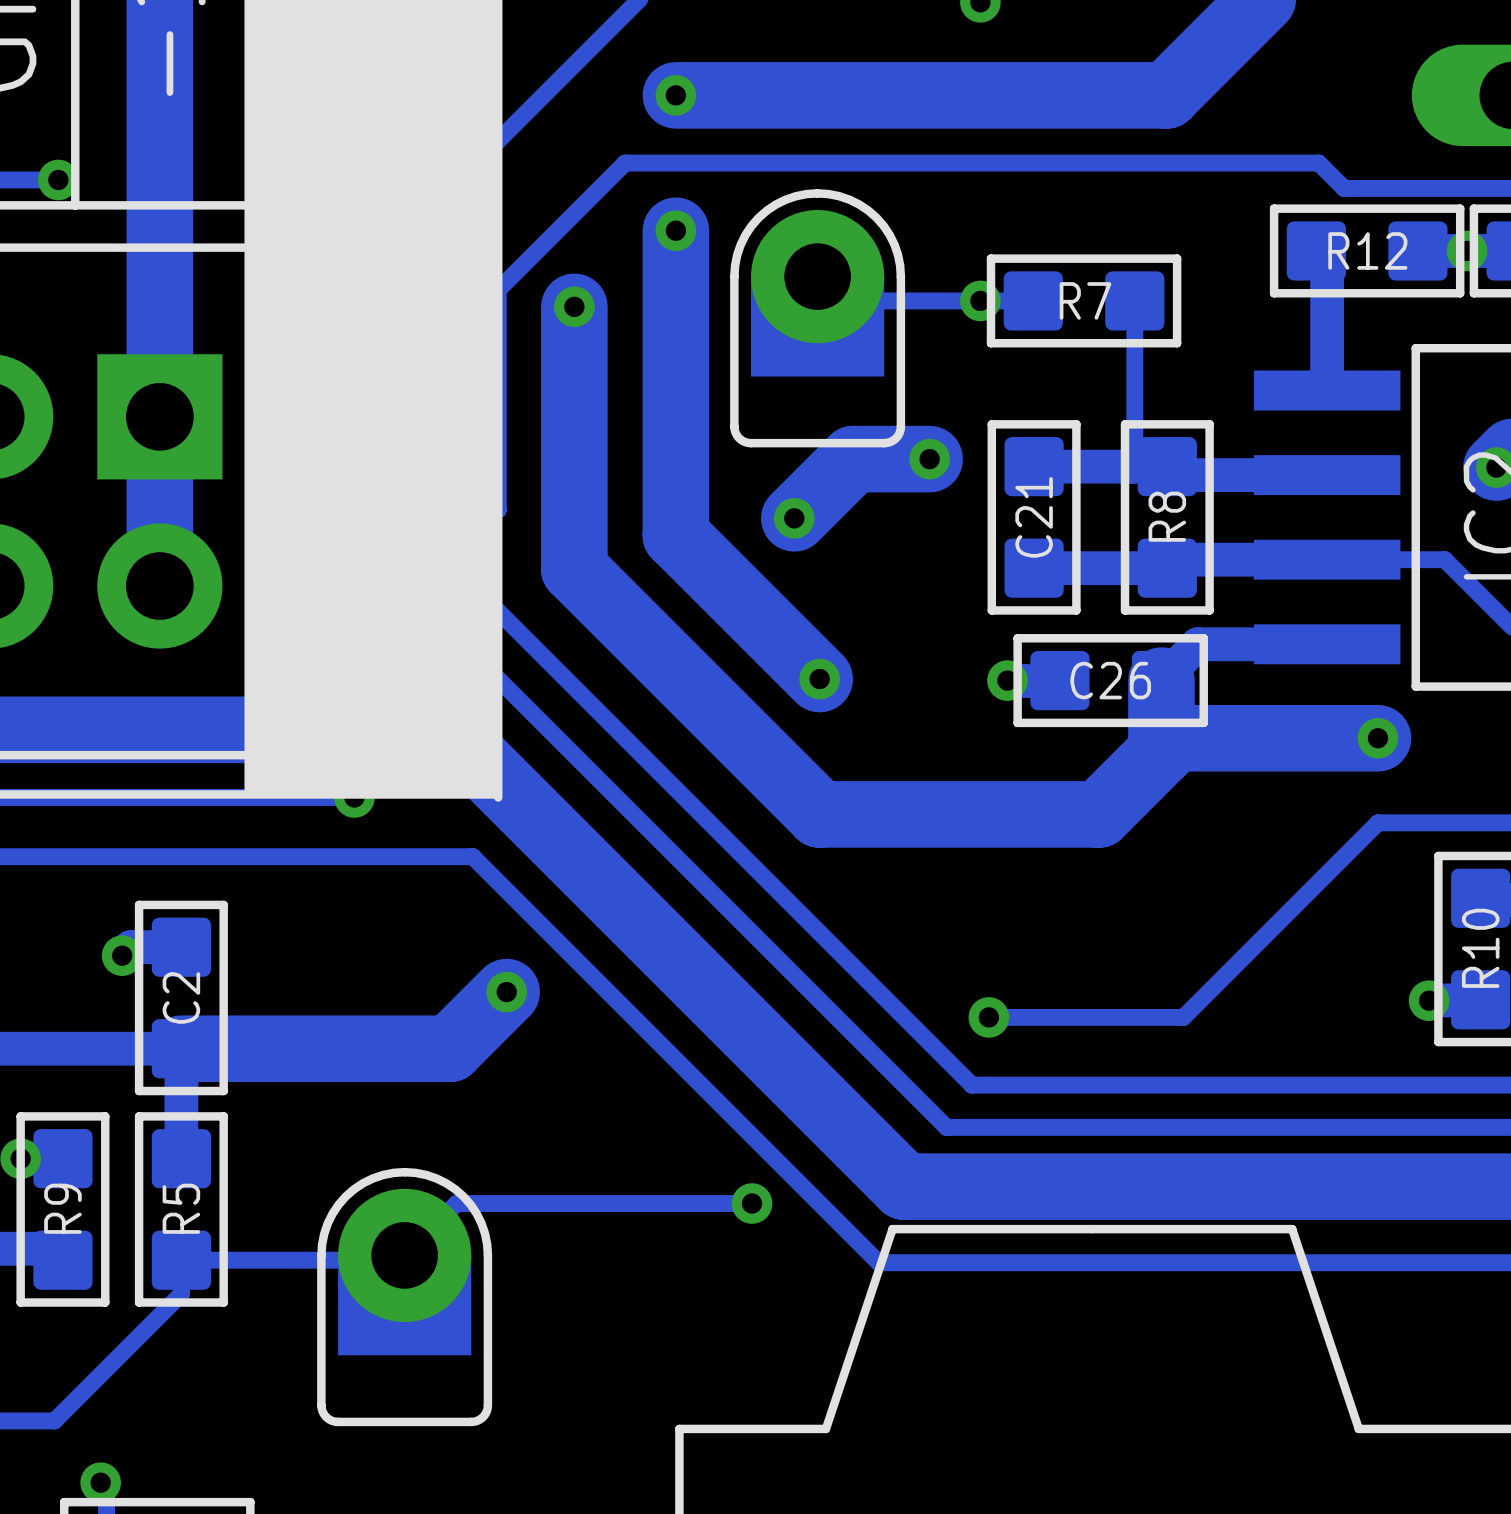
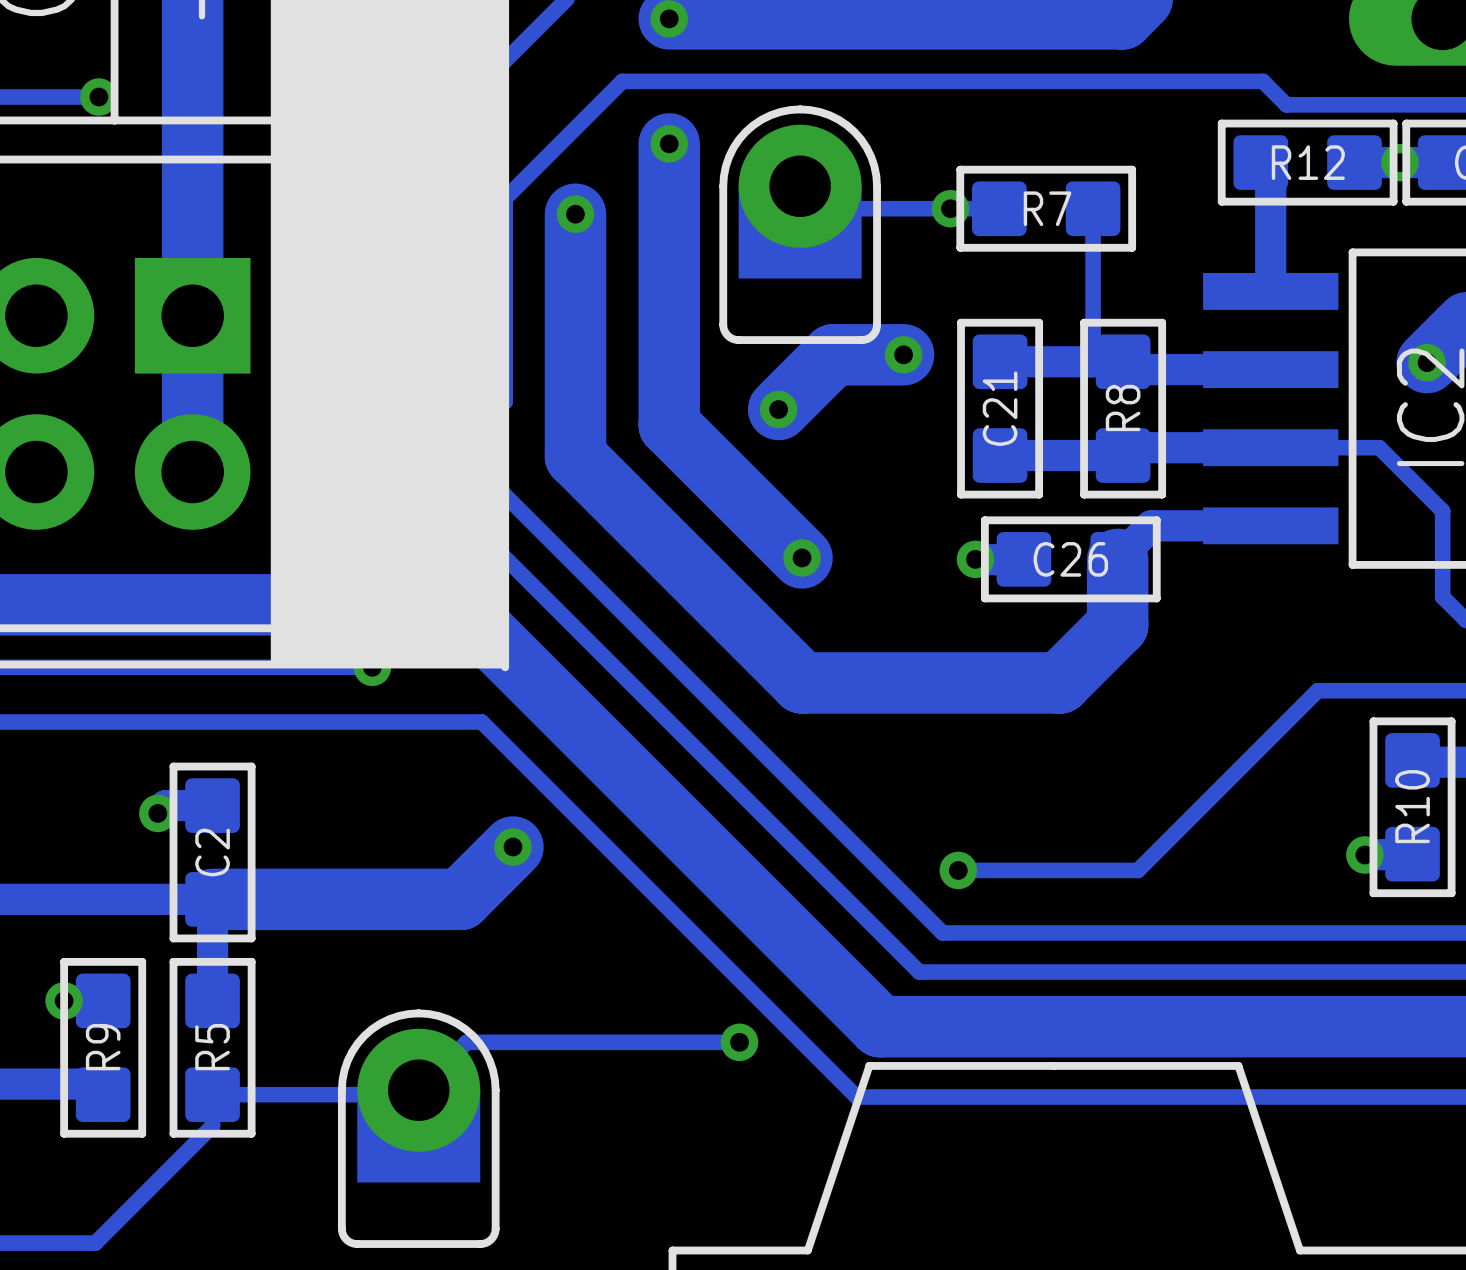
track: (1377, 738) (1174, 738) (1161, 751) -> none
via: (1377, 738) -> none

